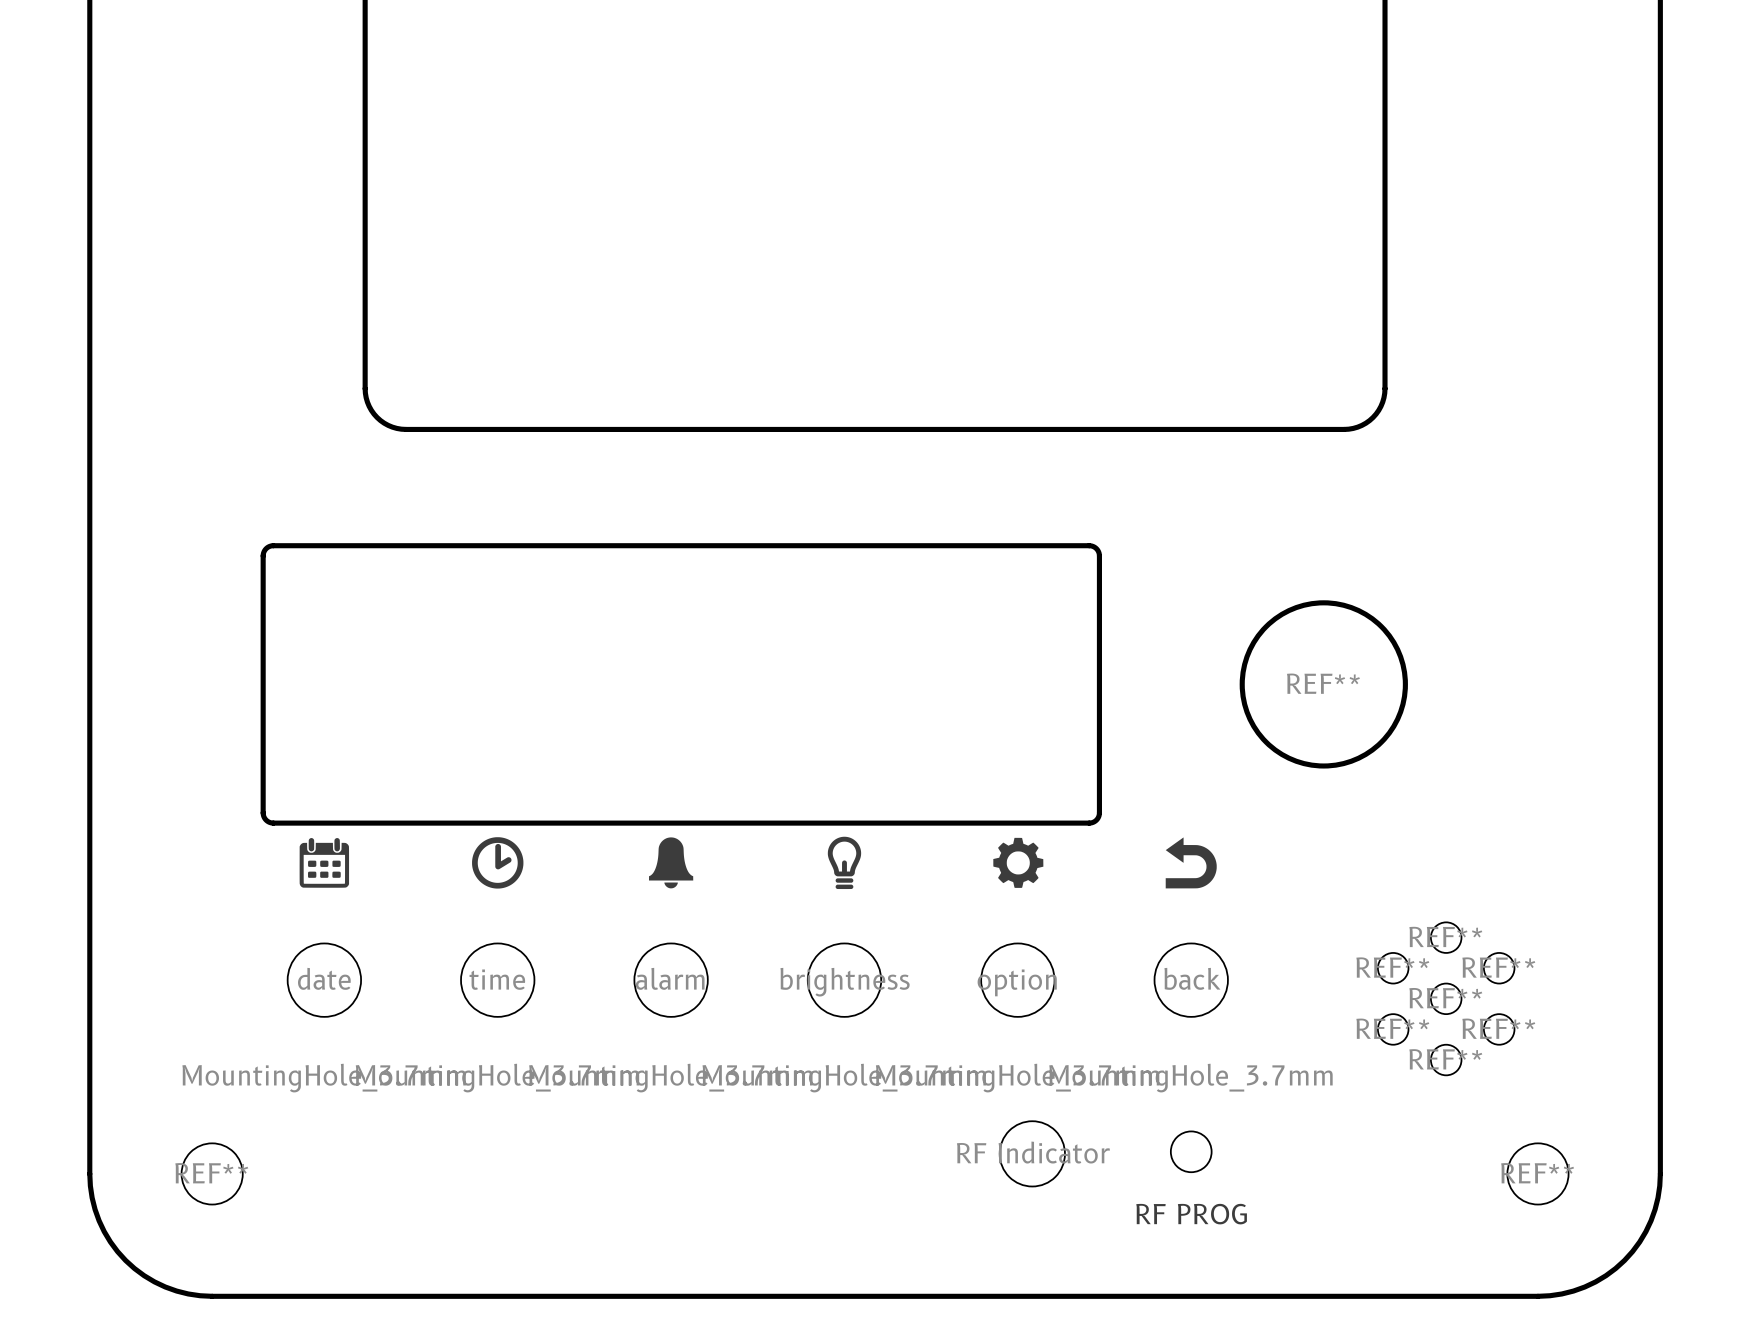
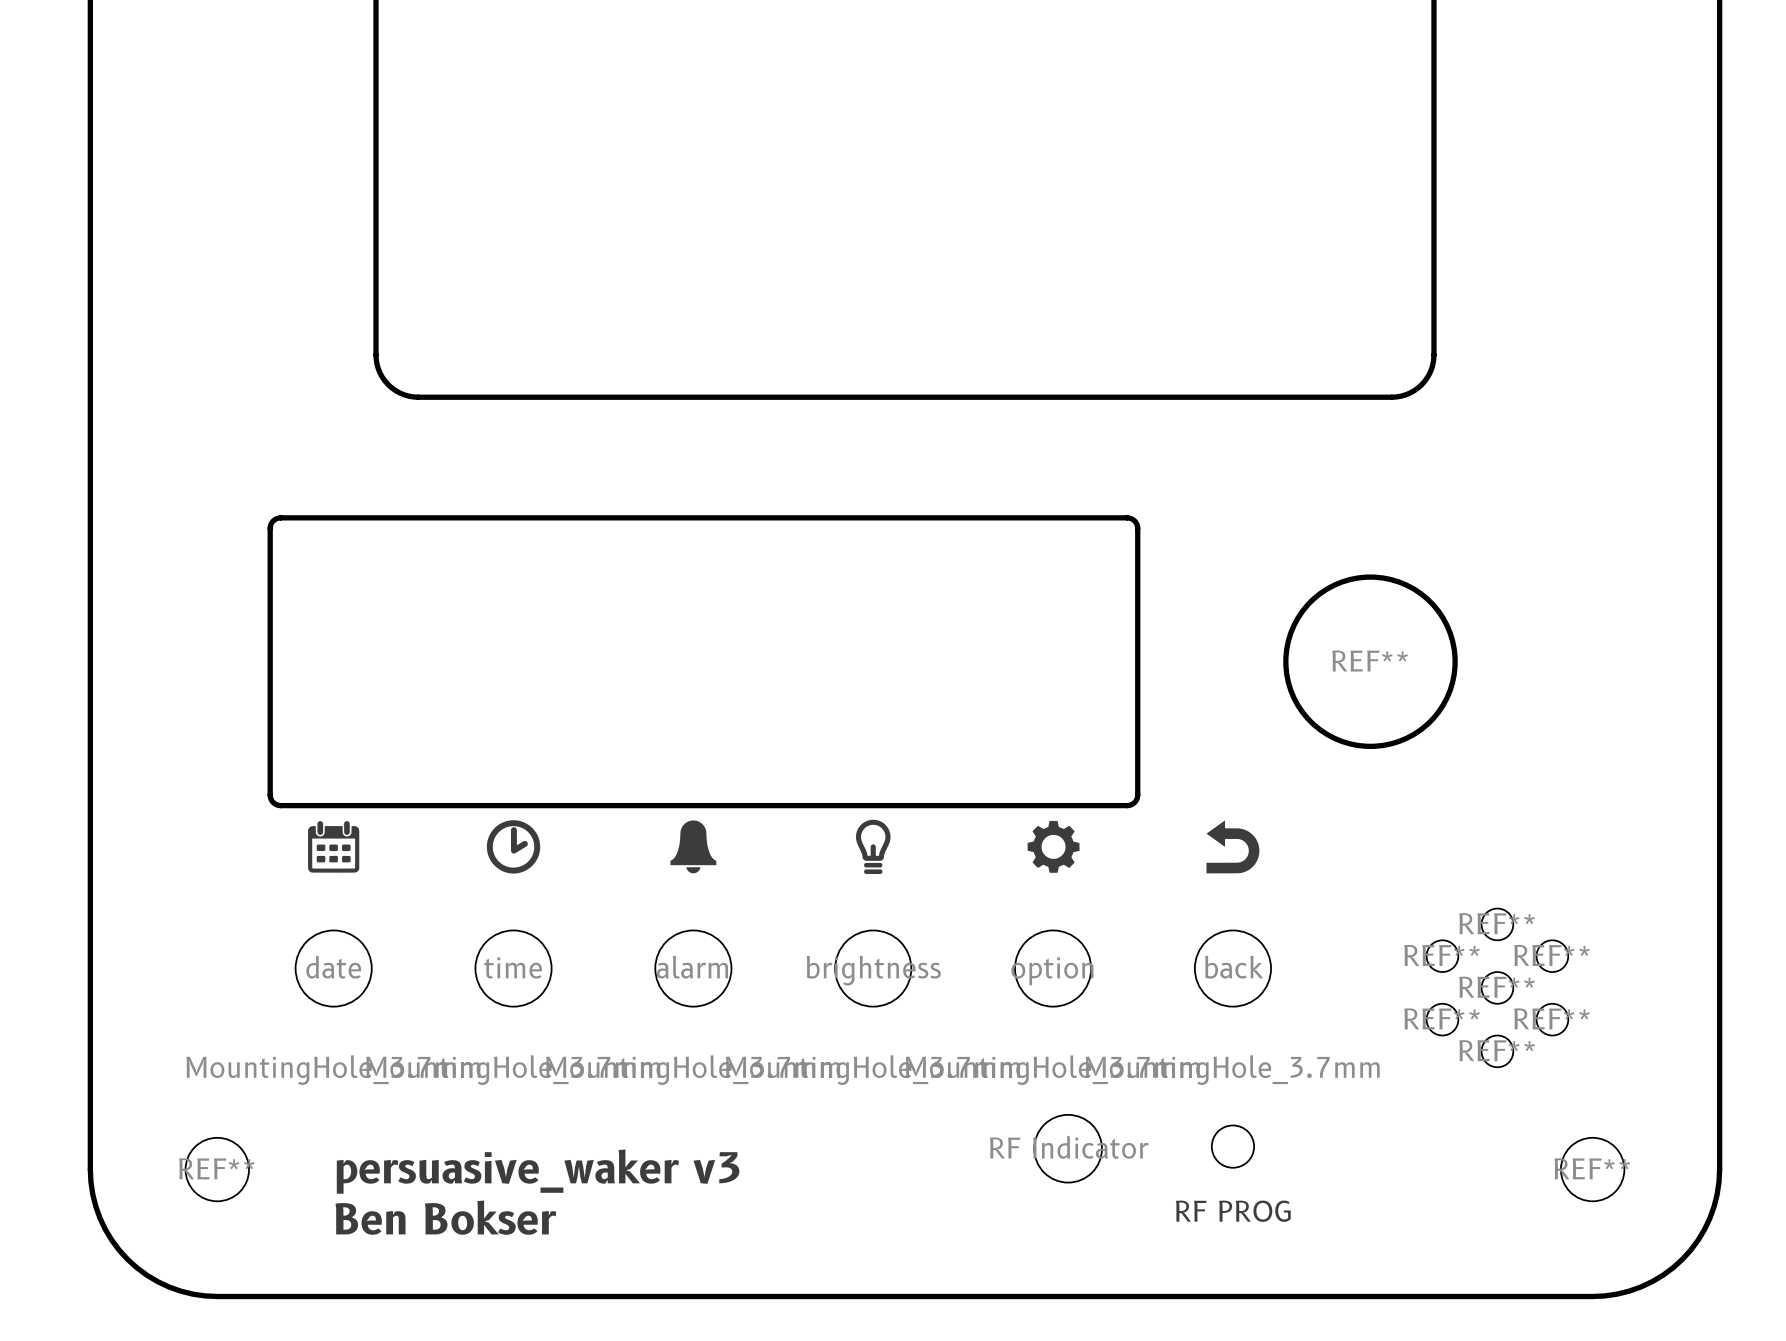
text: none -> persuasive_waker v3 (538, 1171)
text: none -> Ben Bokser (445, 1217)

